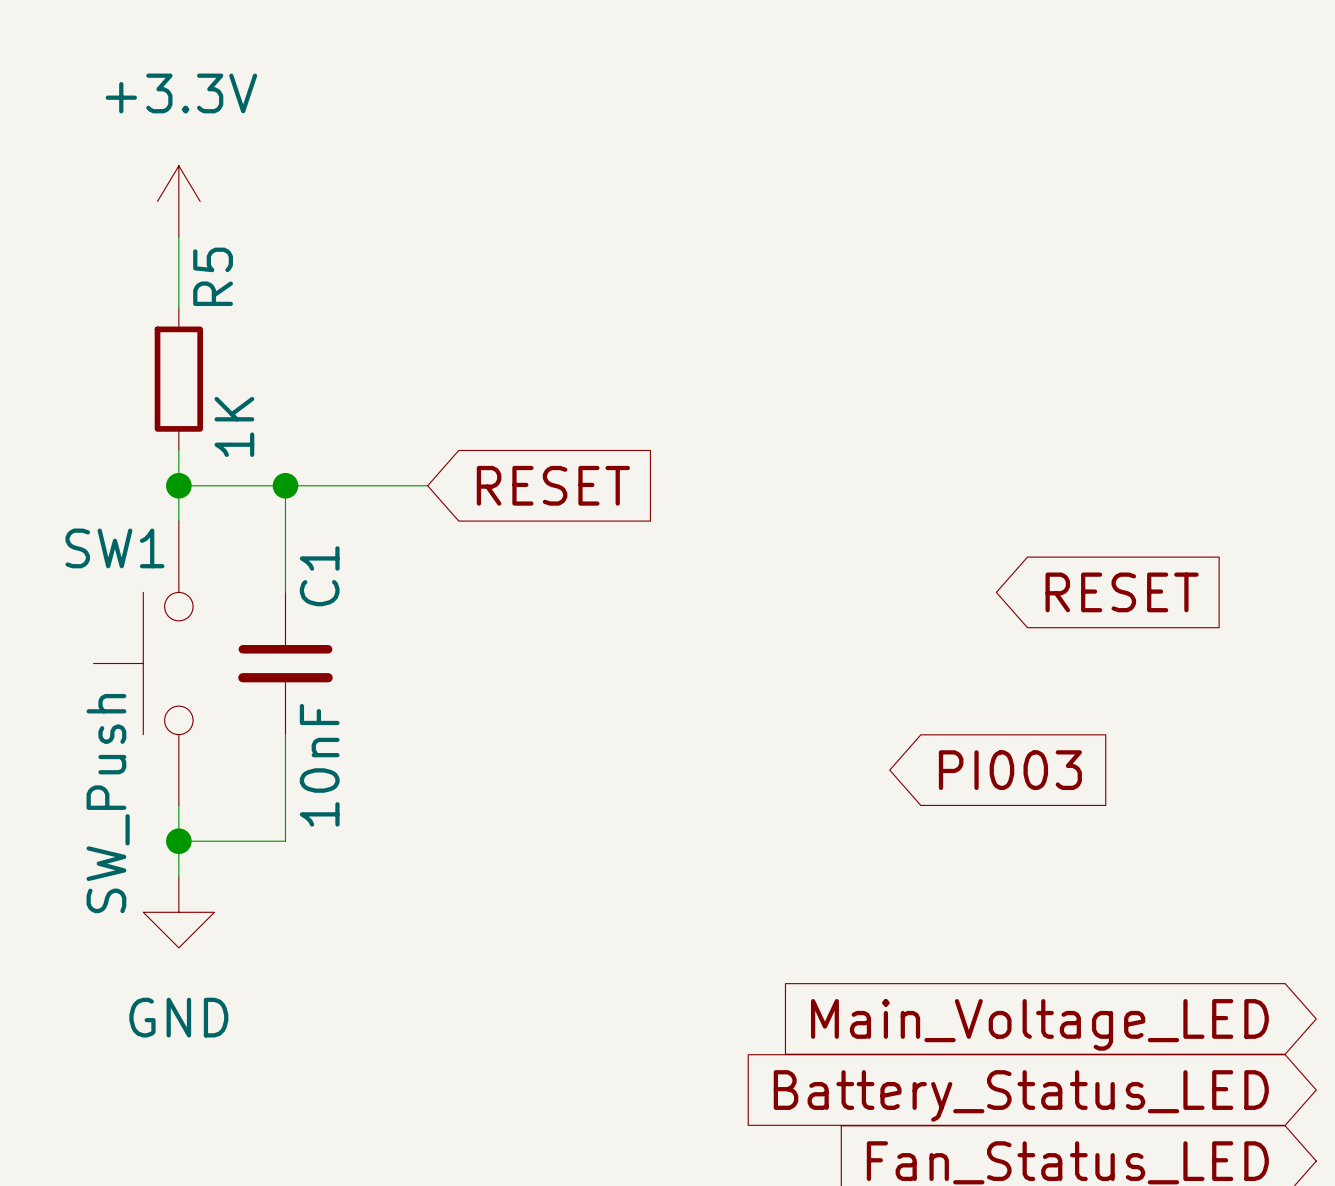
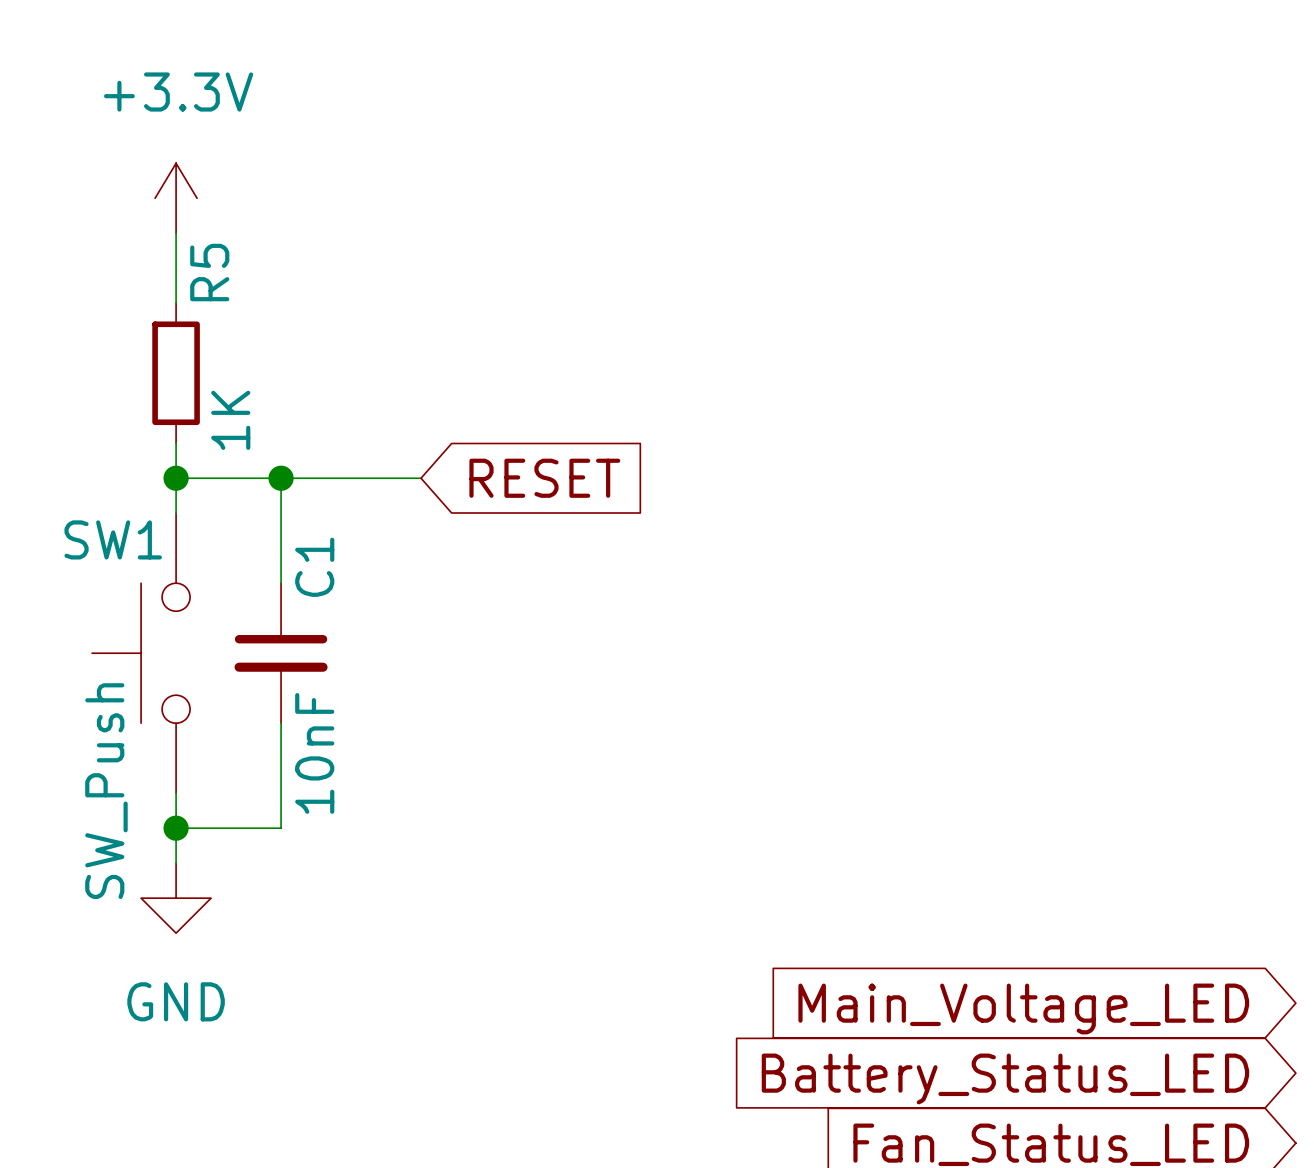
global label: RESET (1122, 592) -> none
global label: PI003 (1010, 770) -> none

